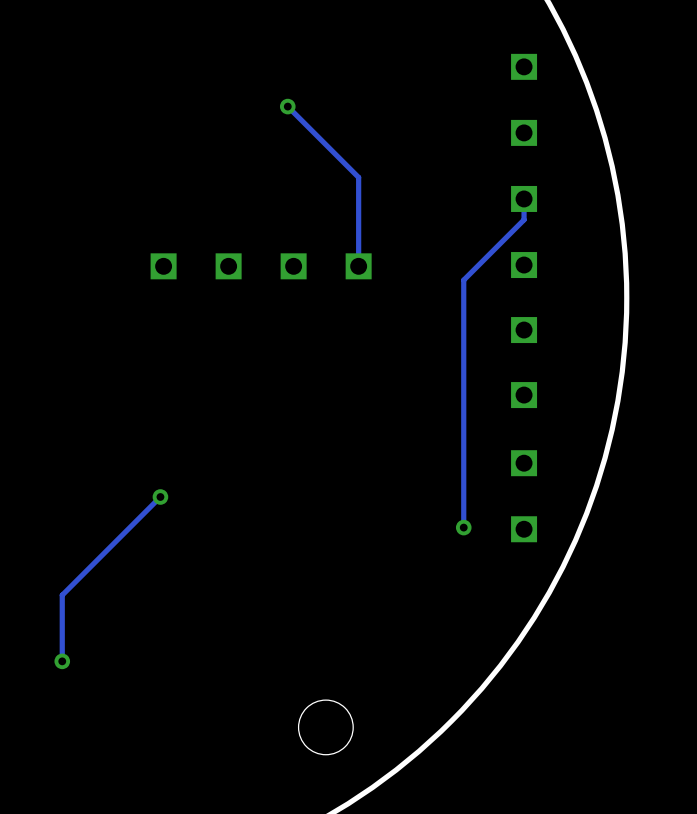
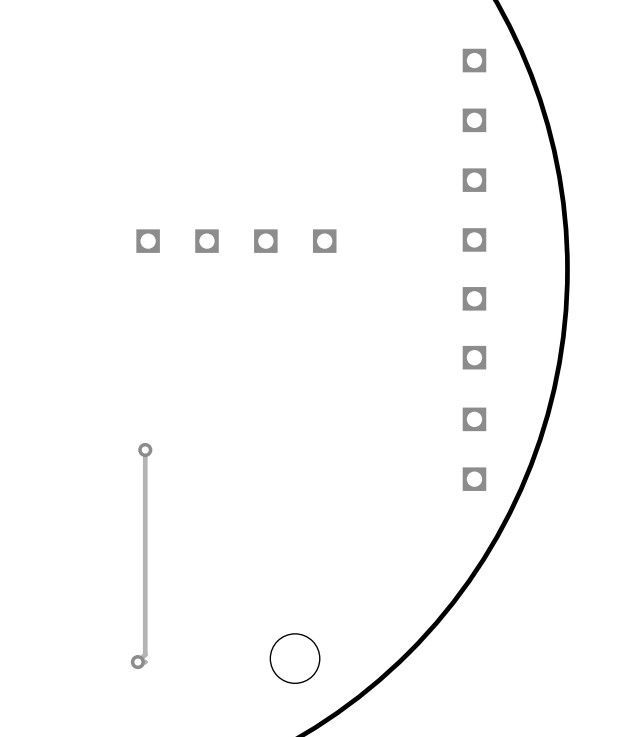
track: (287, 106) (358, 177) (358, 266) -> none
via: (287, 106) -> none
track: (524, 198) (524, 219) (463, 280) (463, 527) -> none
track: (160, 497) (62, 595) (62, 661) -> (145, 449) (145, 654) (137, 662) (145, 662)
via: (463, 527) -> none
via position: (62, 661) -> (137, 662)

